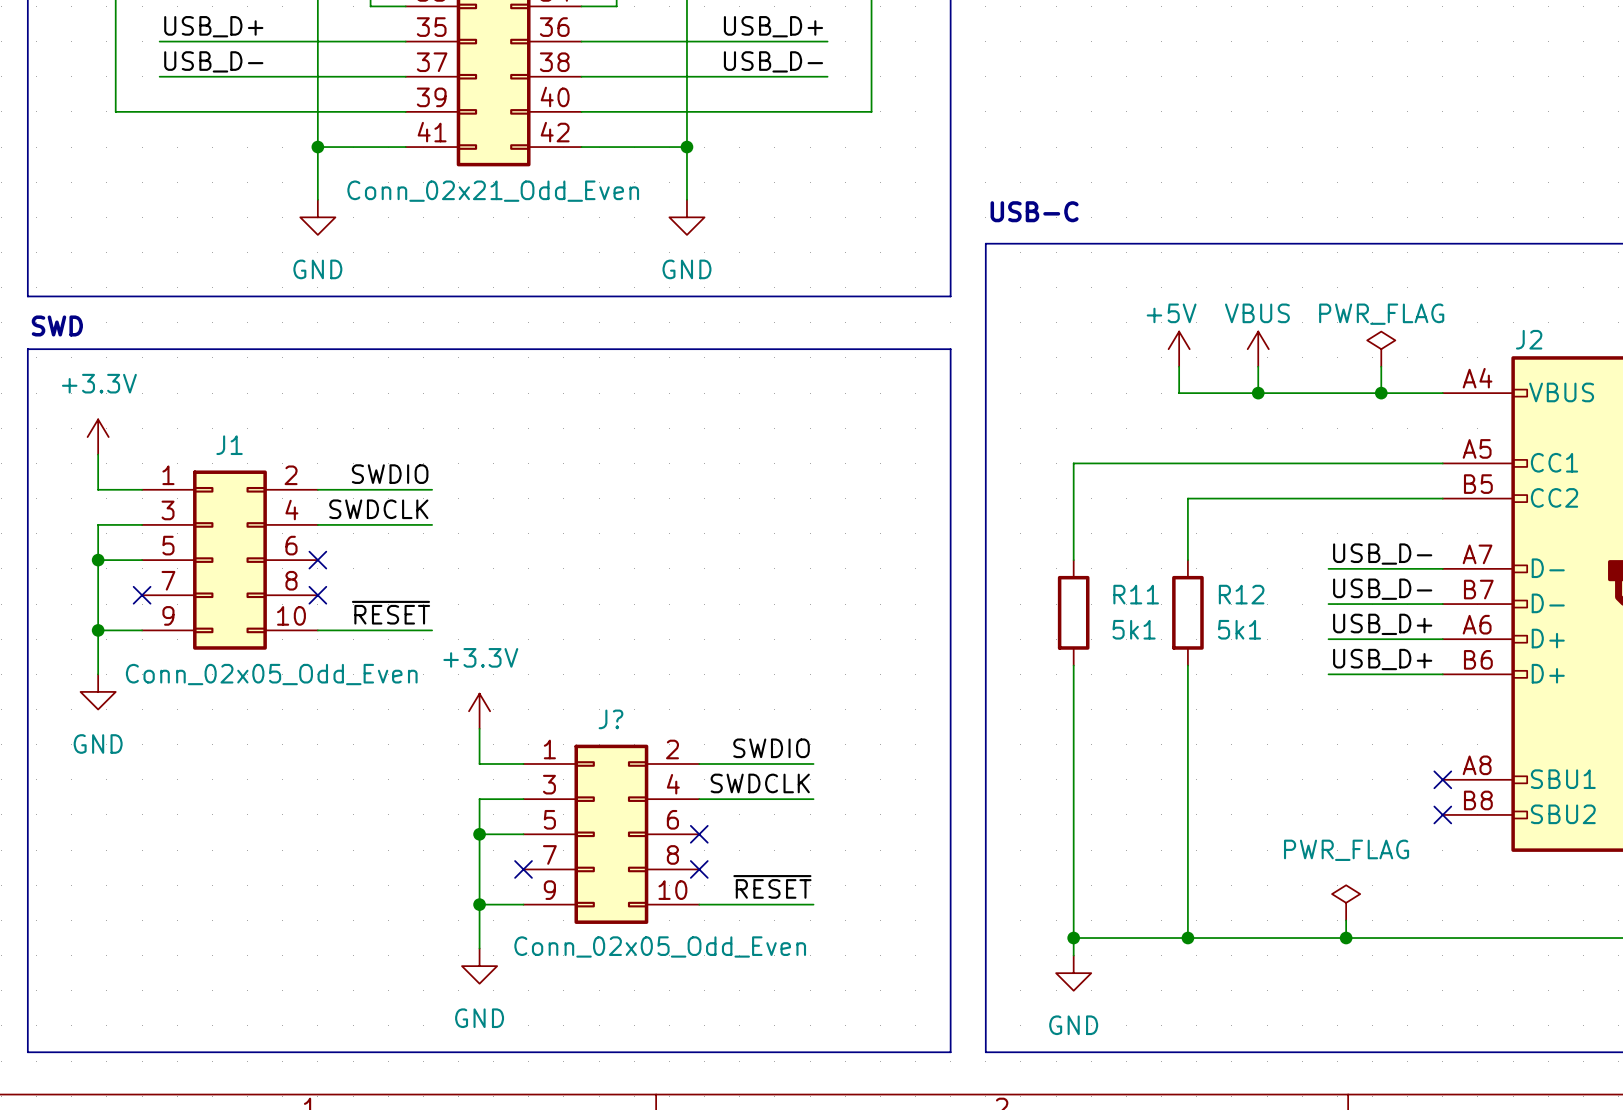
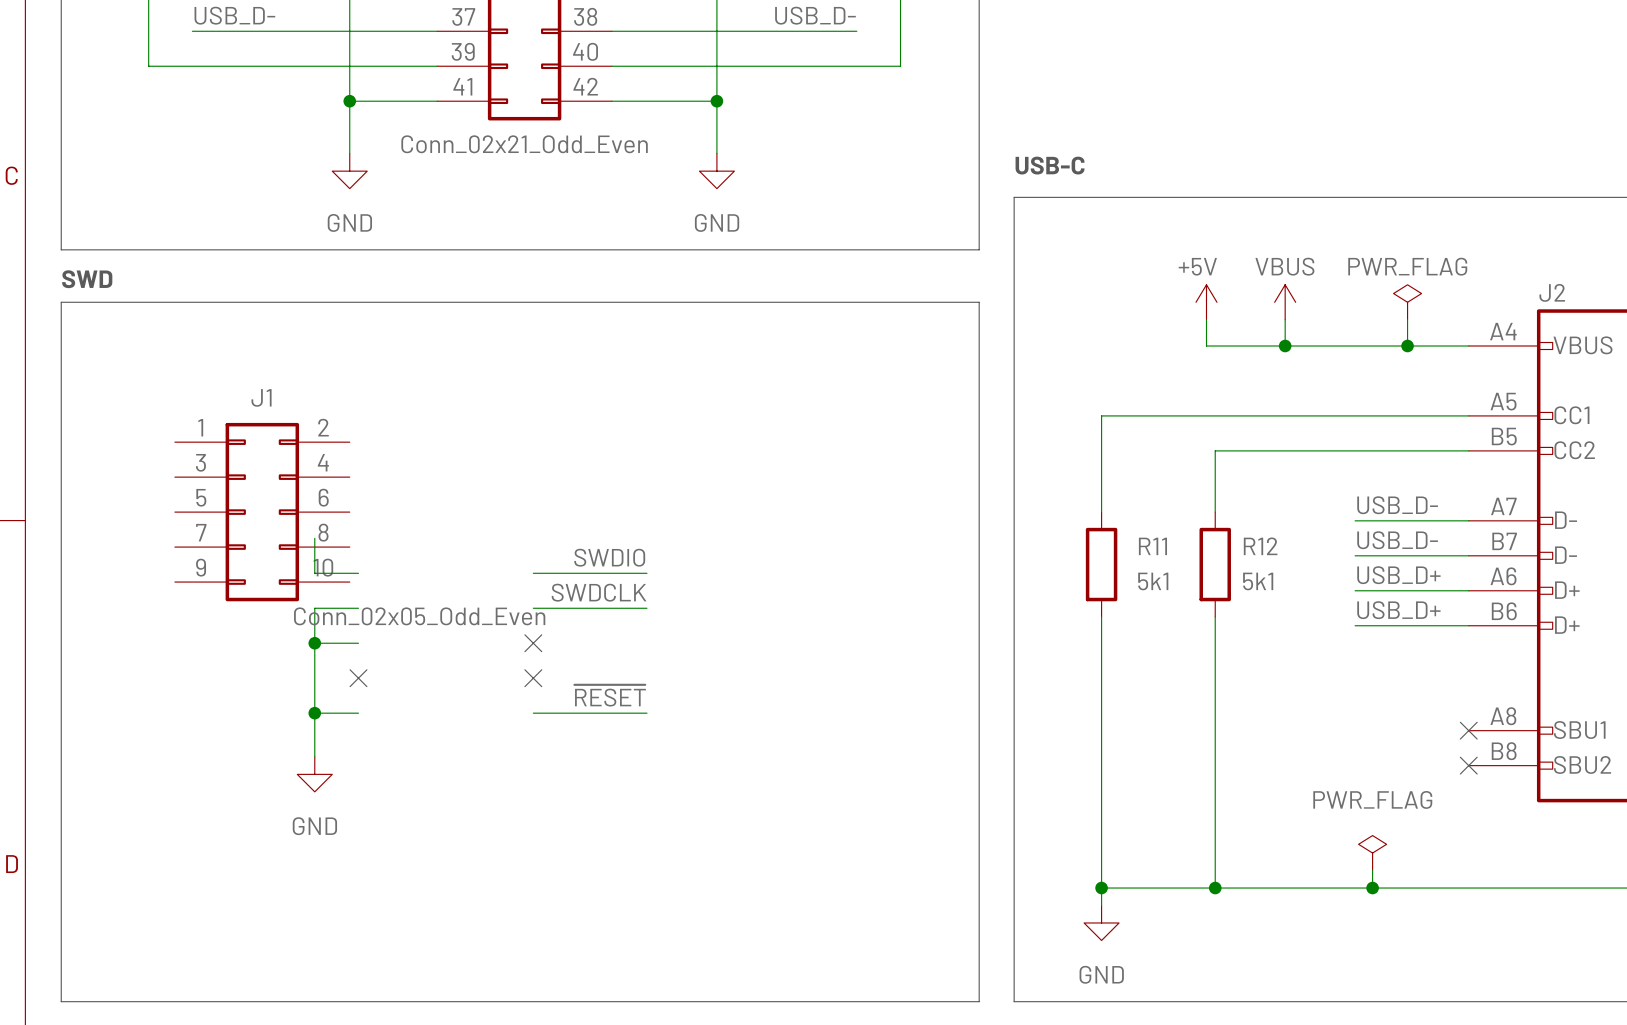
power symbol: +3.3V (98, 437) -> none
wire: (98, 454) (98, 489) (142, 489) -> (314, 538) (314, 573) (358, 573)
label: SWDIO (390, 474) -> none
wire: (317, 489) (432, 489) -> (533, 573) (646, 573)
label: SWDCLK (378, 509) -> none
wire: (142, 524) (98, 524) (98, 674) -> (358, 608) (314, 608) (314, 756)
wire: (317, 524) (432, 524) -> (533, 608) (646, 608)
wire: (98, 560) (142, 560) -> (314, 643) (358, 643)
junction: (98, 560) -> none
no-connect mark: (317, 560) -> none
no-connect mark: (142, 595) -> none
no-connect mark: (317, 595) -> none
label: none -> SWDIO (609, 557)
label: ~{RESET} (391, 612) -> none
wire: (98, 630) (142, 630) -> (314, 713) (358, 713)
junction: (98, 630) -> none
wire: (317, 630) (432, 630) -> (533, 713) (646, 713)
label: none -> SWDCLK (599, 592)
J1 value position: Conn_02x05_Odd_Even (271, 674) -> Conn_02x05_Odd_Even (419, 616)
power symbol: GND (98, 691) -> none
junction: none -> (314, 643)
no-connect mark: none -> (533, 643)
power symbol: +3.3V (479, 711) -> none
no-connect mark: none -> (358, 678)
no-connect mark: none -> (533, 678)
wire: (479, 728) (479, 763) (523, 763) -> none
label: none -> ~{RESET} (610, 695)
label: SWDIO (771, 748) -> none
junction: none -> (314, 713)
wire: (699, 763) (813, 763) -> none
label: SWDCLK (760, 783) -> none
wire: (523, 799) (479, 799) (479, 948) -> none
wire: (699, 799) (813, 799) -> none
power symbol: none -> GND (314, 774)
wire: (479, 834) (523, 834) -> none
junction: (479, 834) -> none
J?: Conn_02x05_Odd_Even (611, 834) -> none
no-connect mark: (699, 834) -> none
no-connect mark: (523, 869) -> none
no-connect mark: (699, 869) -> none
label: ~{RESET} (772, 886) -> none
wire: (479, 904) (523, 904) -> none
junction: (479, 904) -> none
wire: (699, 904) (813, 904) -> none
power symbol: GND (479, 966) -> none

